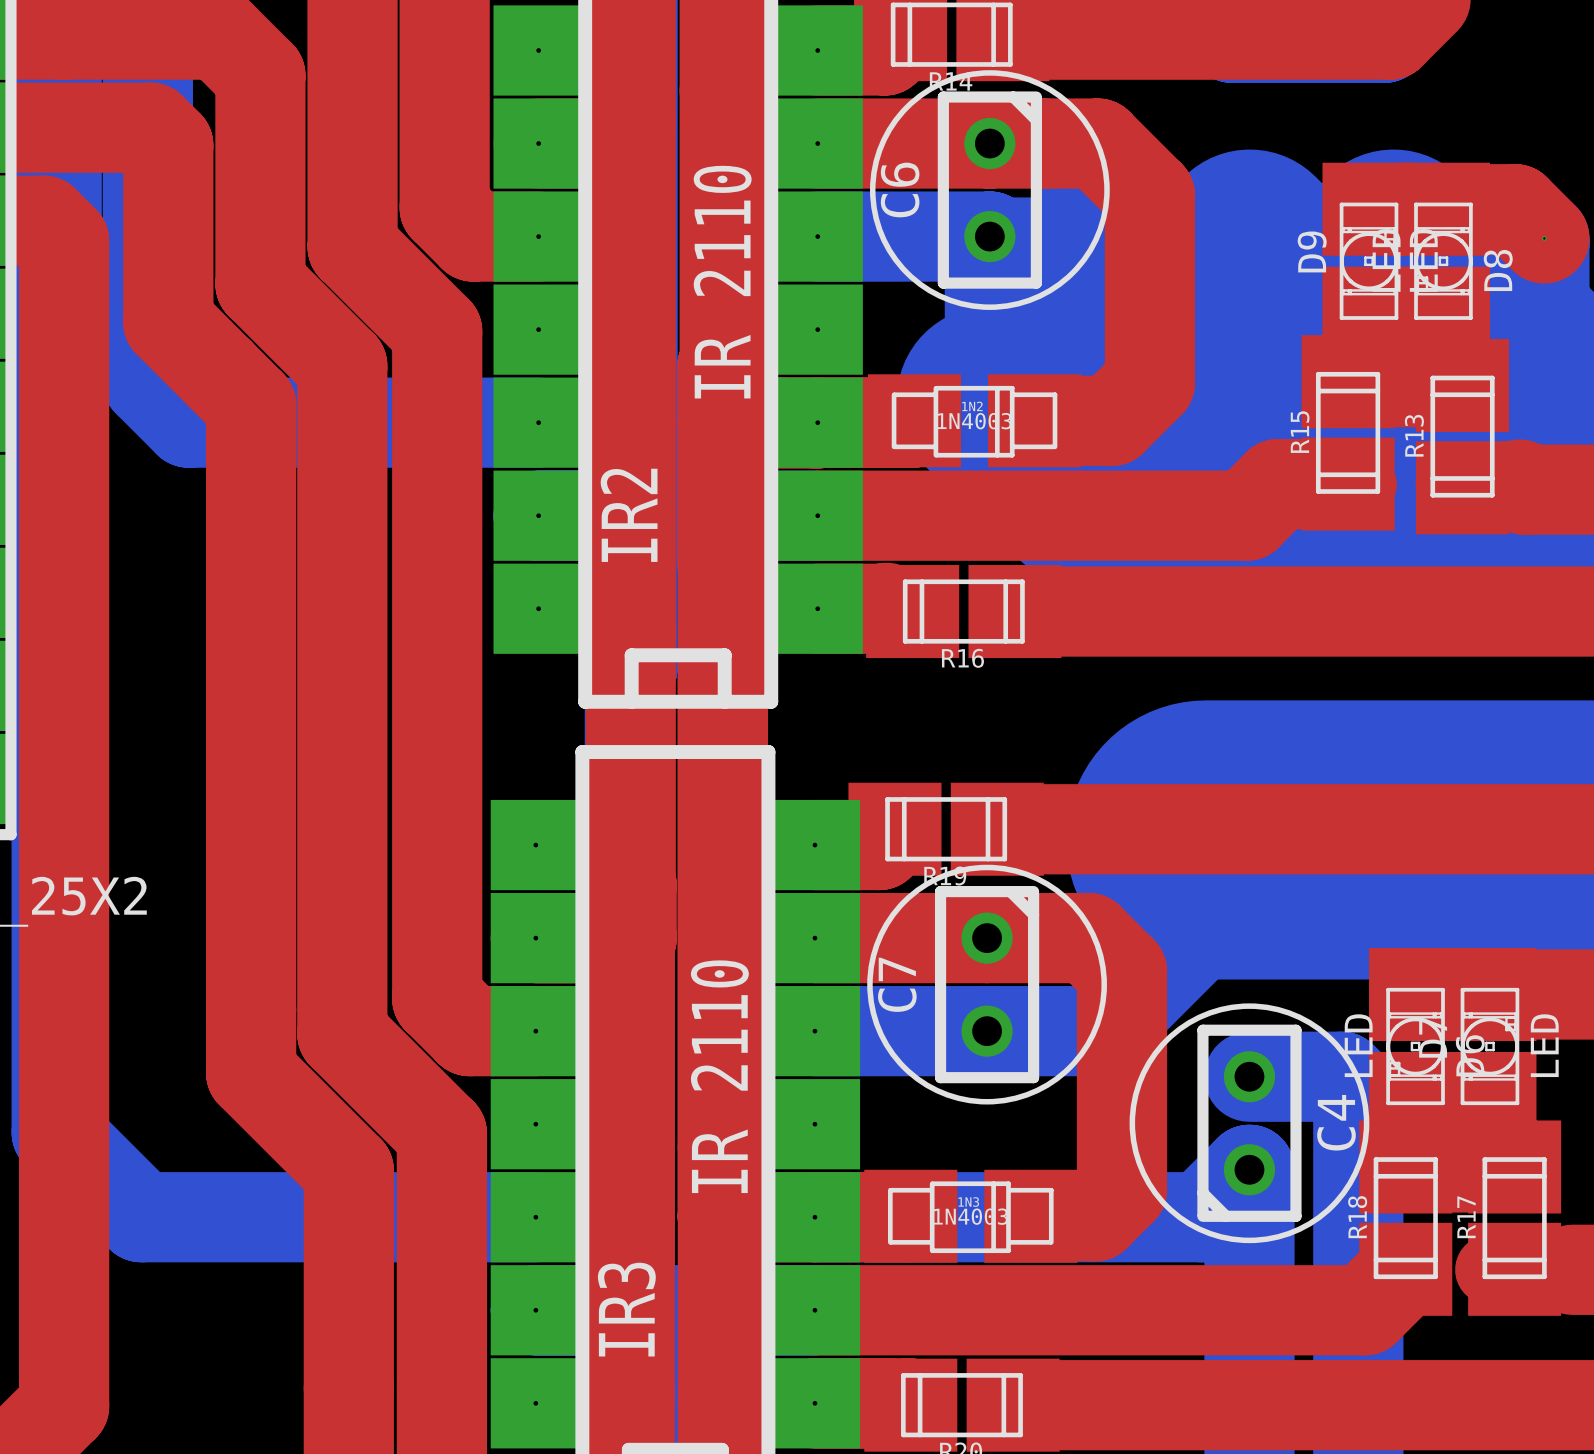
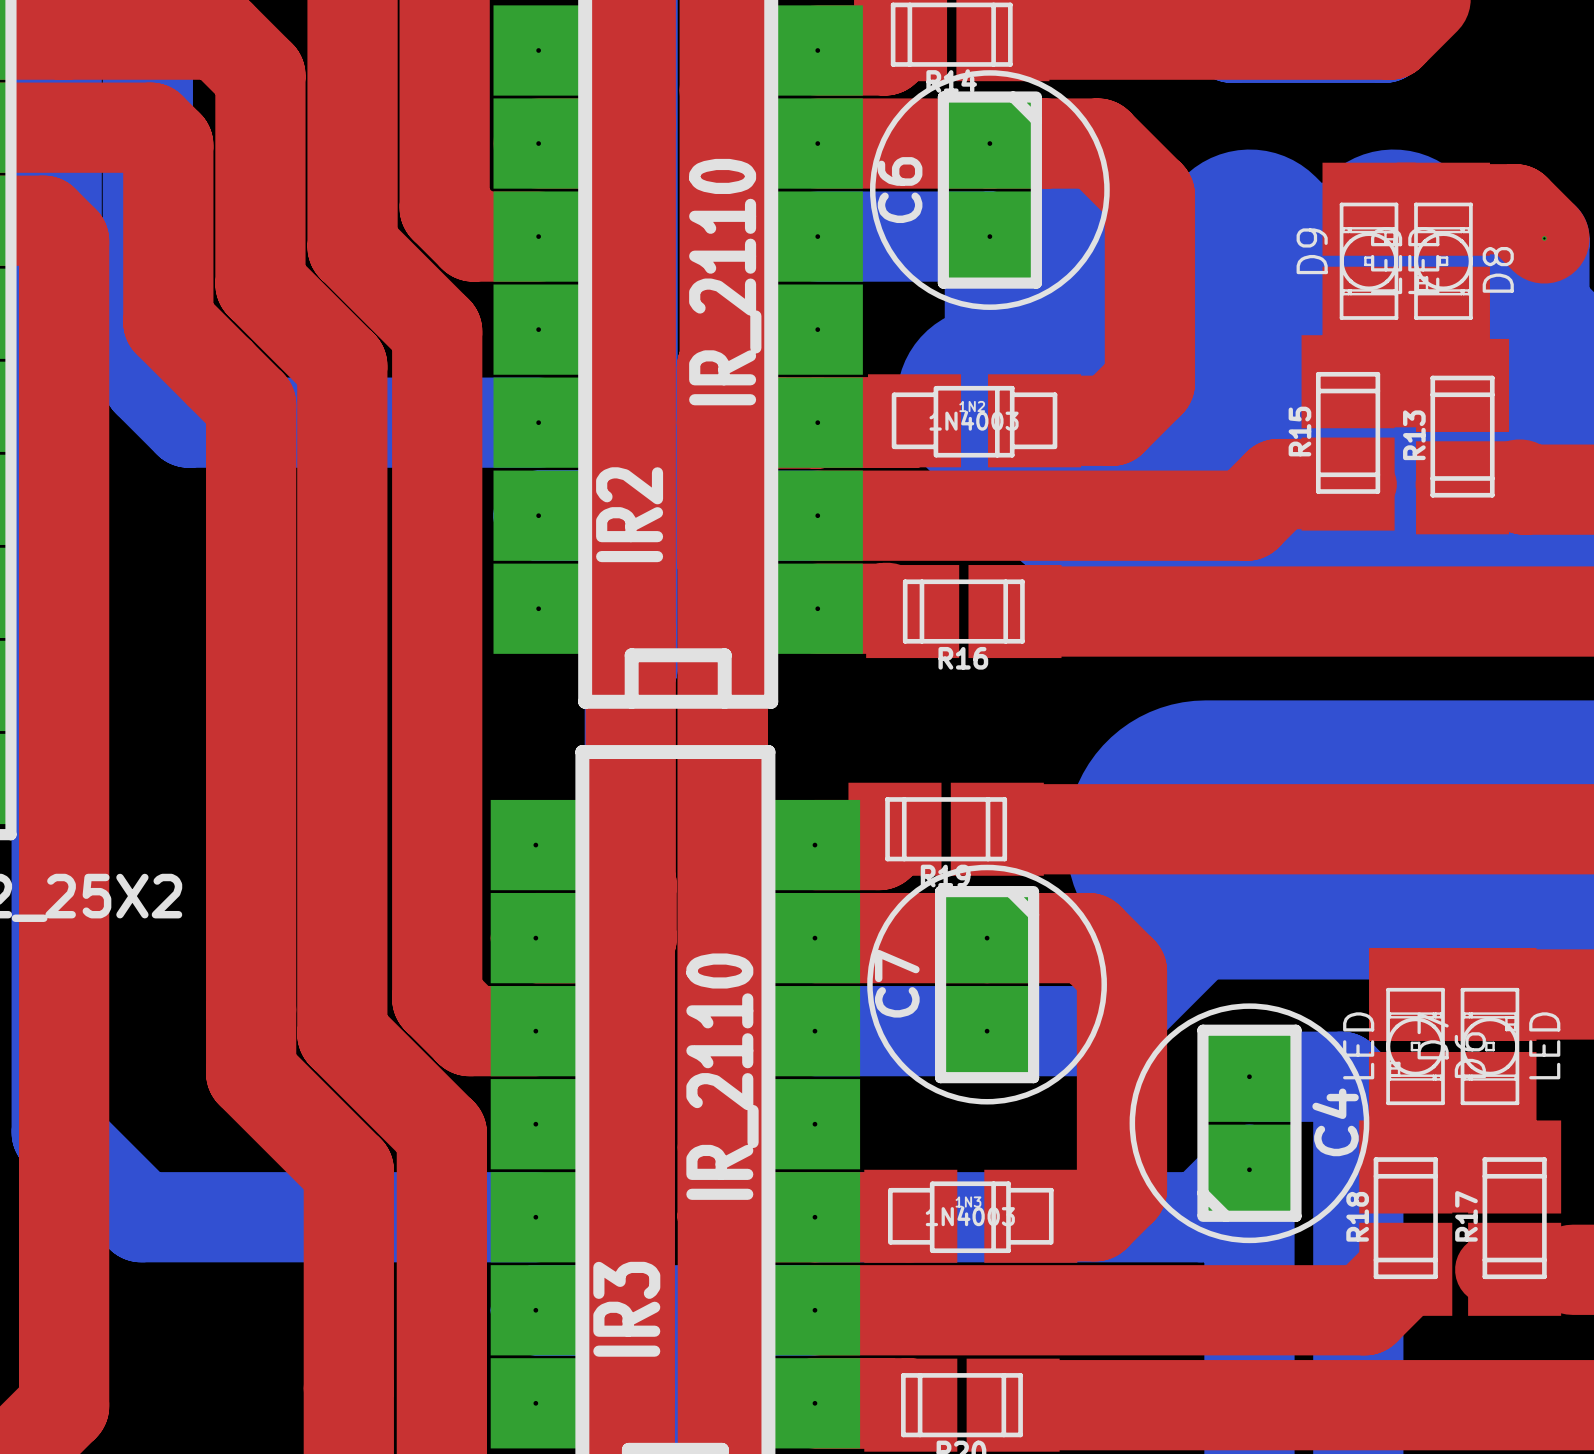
C6 footprint: [869, 70, 1110, 310] -> [869, 70, 1110, 310]
C7 footprint: [867, 864, 1107, 1105] -> [867, 864, 1107, 1105]
C4 footprint: [1129, 1003, 1370, 1244] -> [1129, 1003, 1370, 1244]

